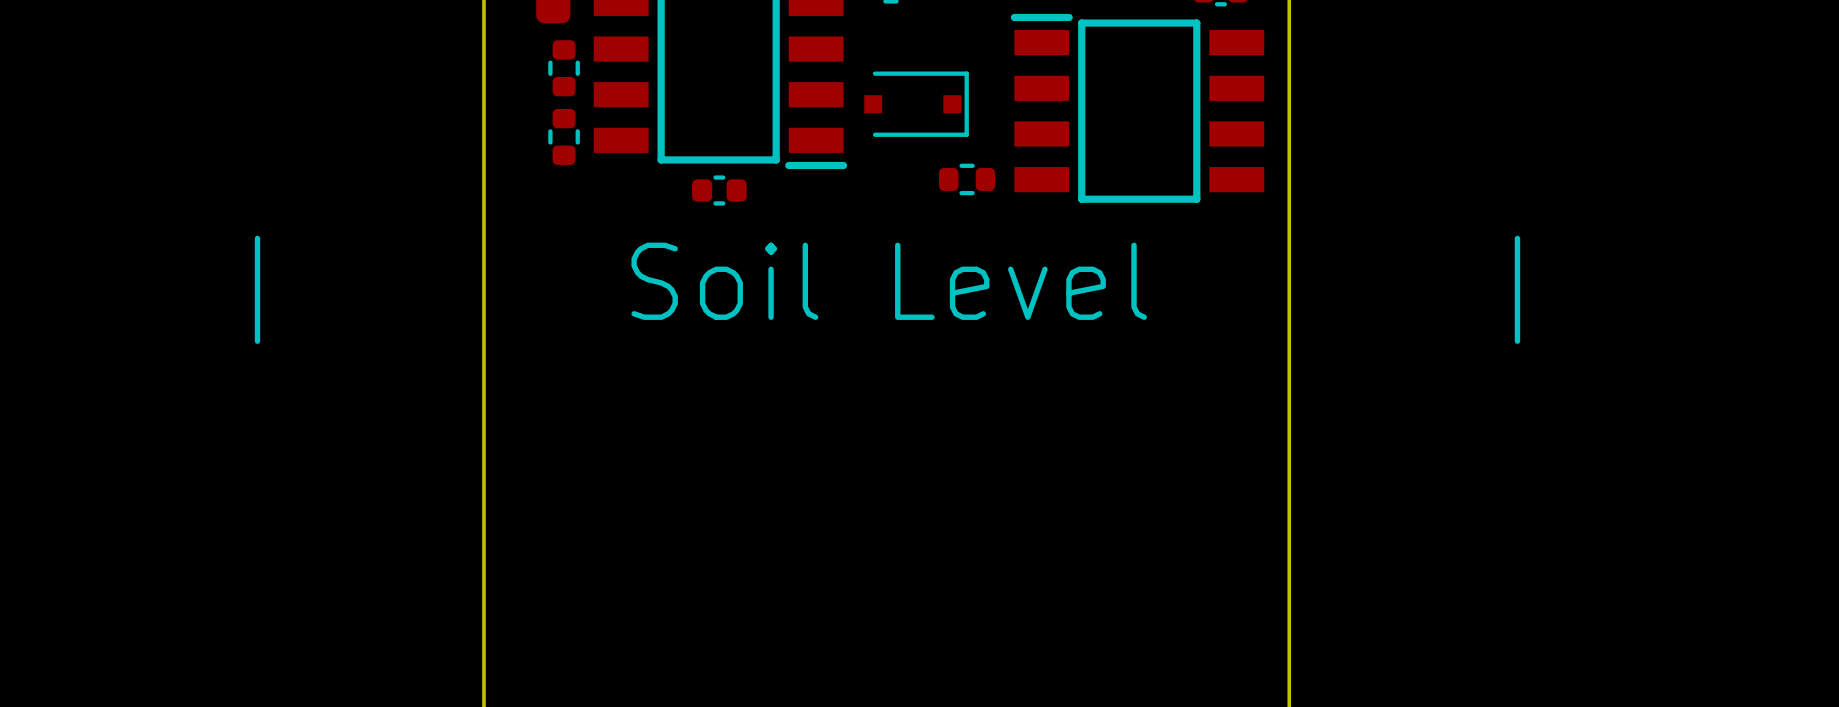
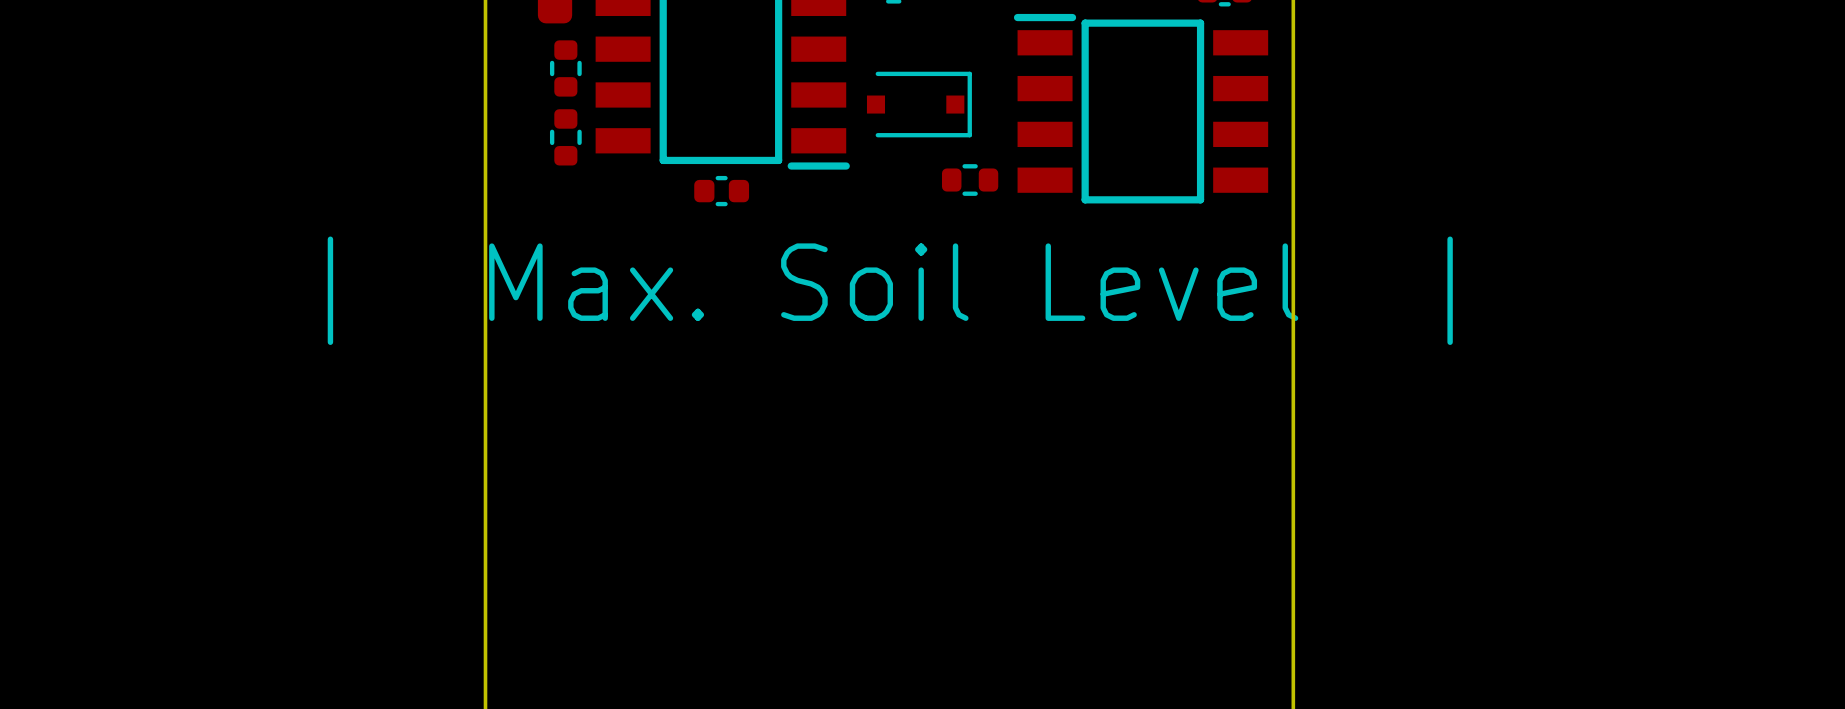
text: | Soil Level | (887, 289) -> | Max. Soil Level | (890, 290)

